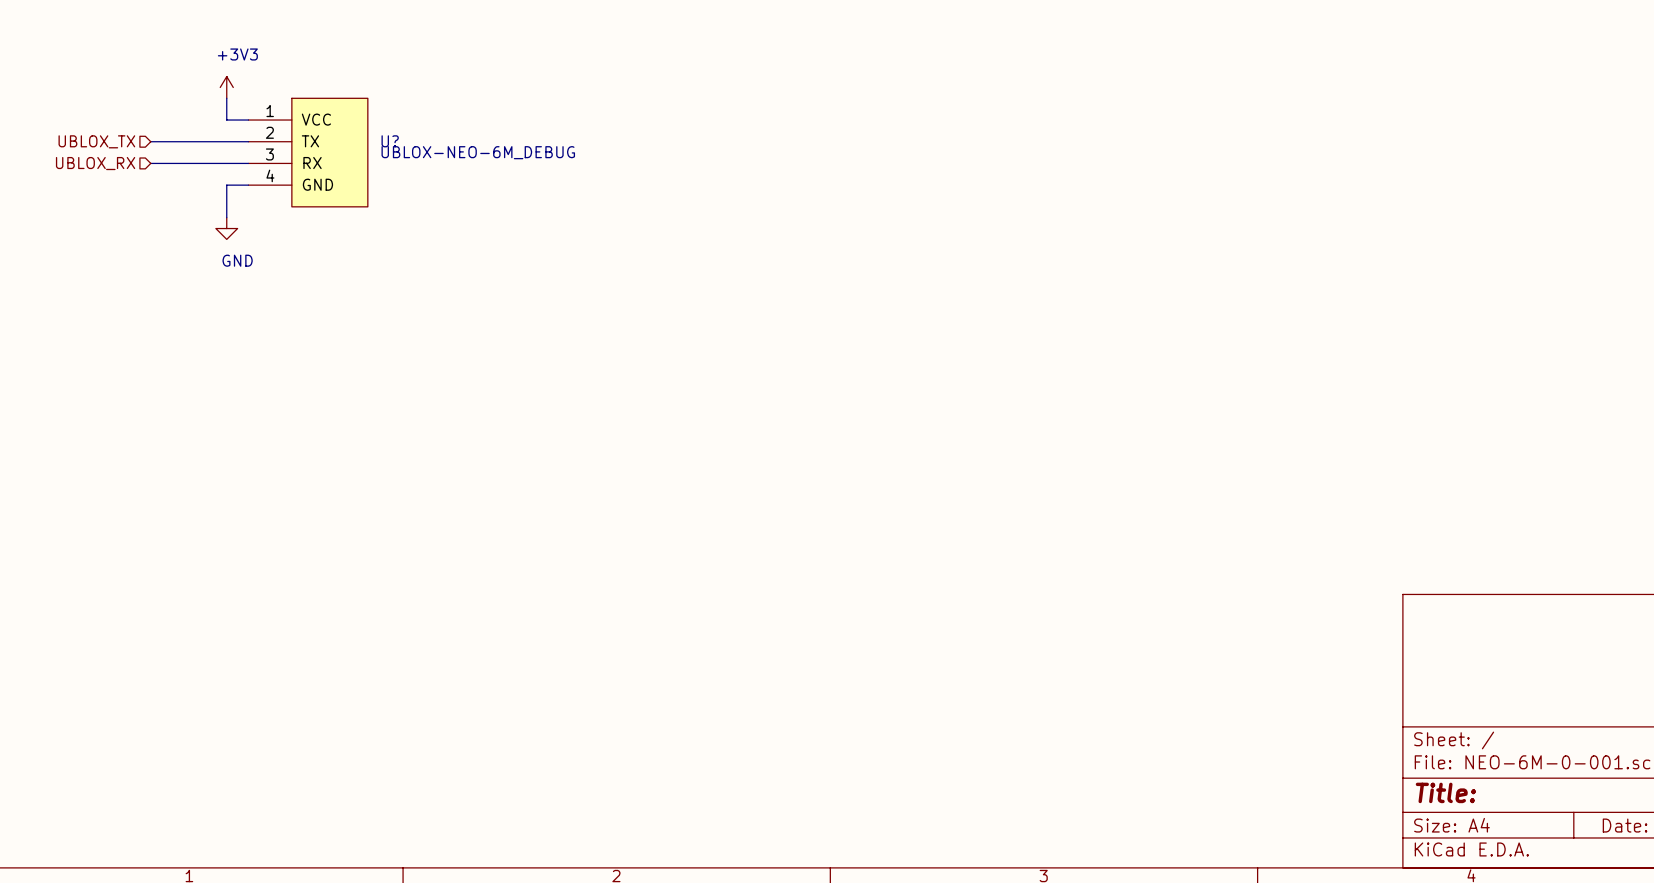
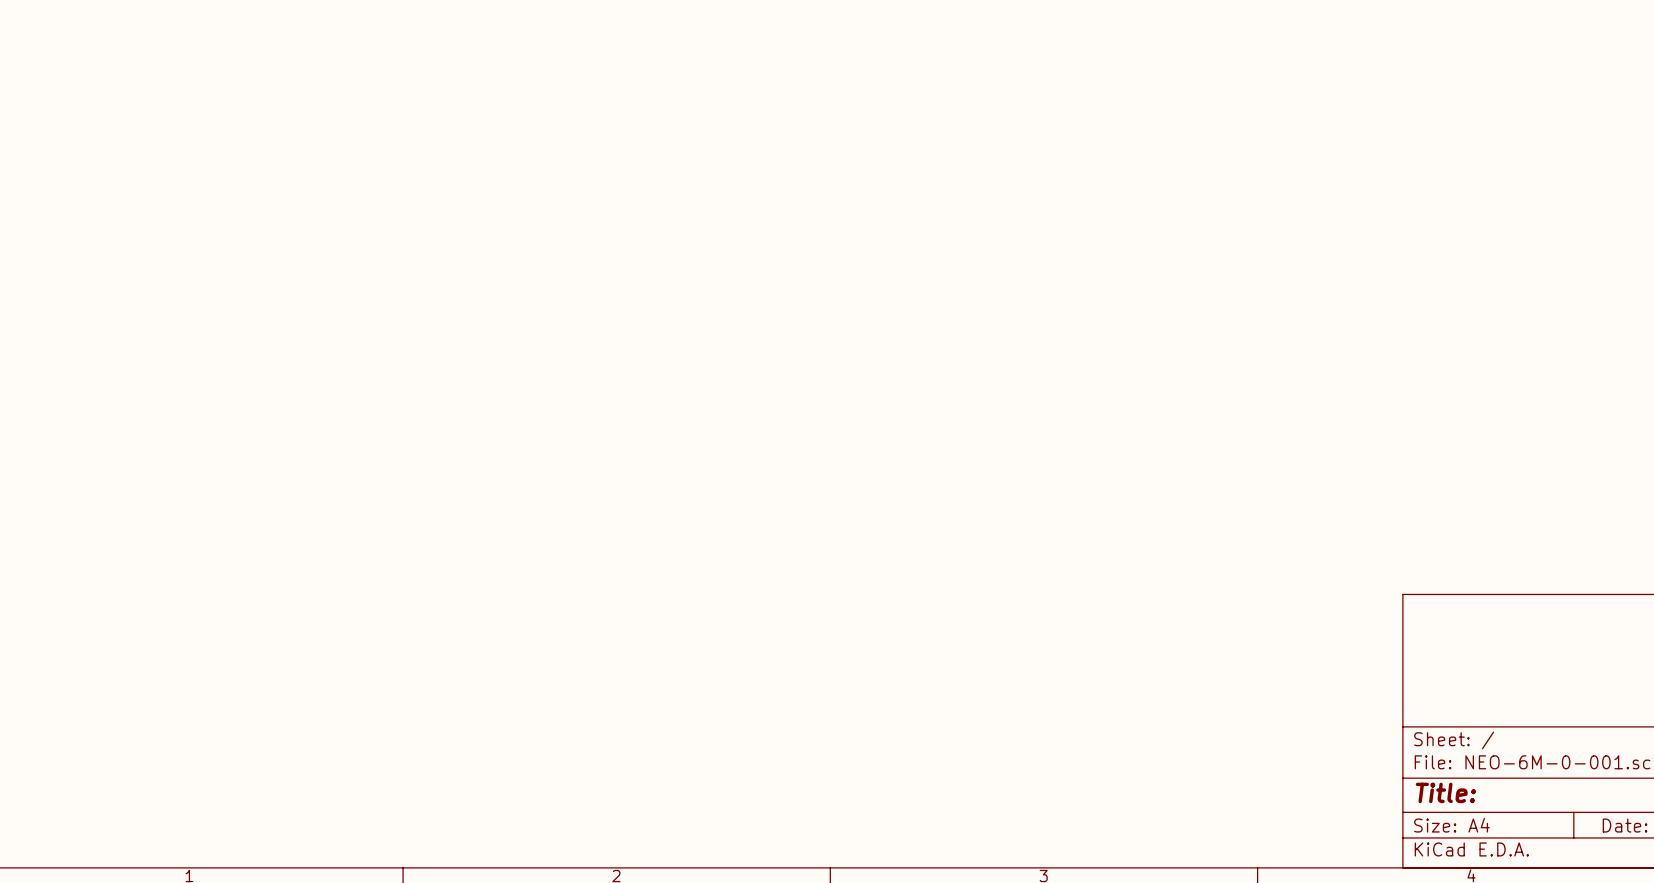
power symbol: +3V3 (226, 87) -> none
wire: (226, 98) (226, 120) (248, 120) -> none
hierarchical label: UBLOX_TX (96, 141) -> none
wire: (150, 141) (248, 141) -> none
U?: UBLOX-NEO-6M_DEBUG (308, 152) -> none
hierarchical label: UBLOX_RX (95, 163) -> none
wire: (150, 163) (248, 163) -> none
wire: (248, 185) (226, 185) (226, 217) -> none
power symbol: GND (226, 228) -> none

